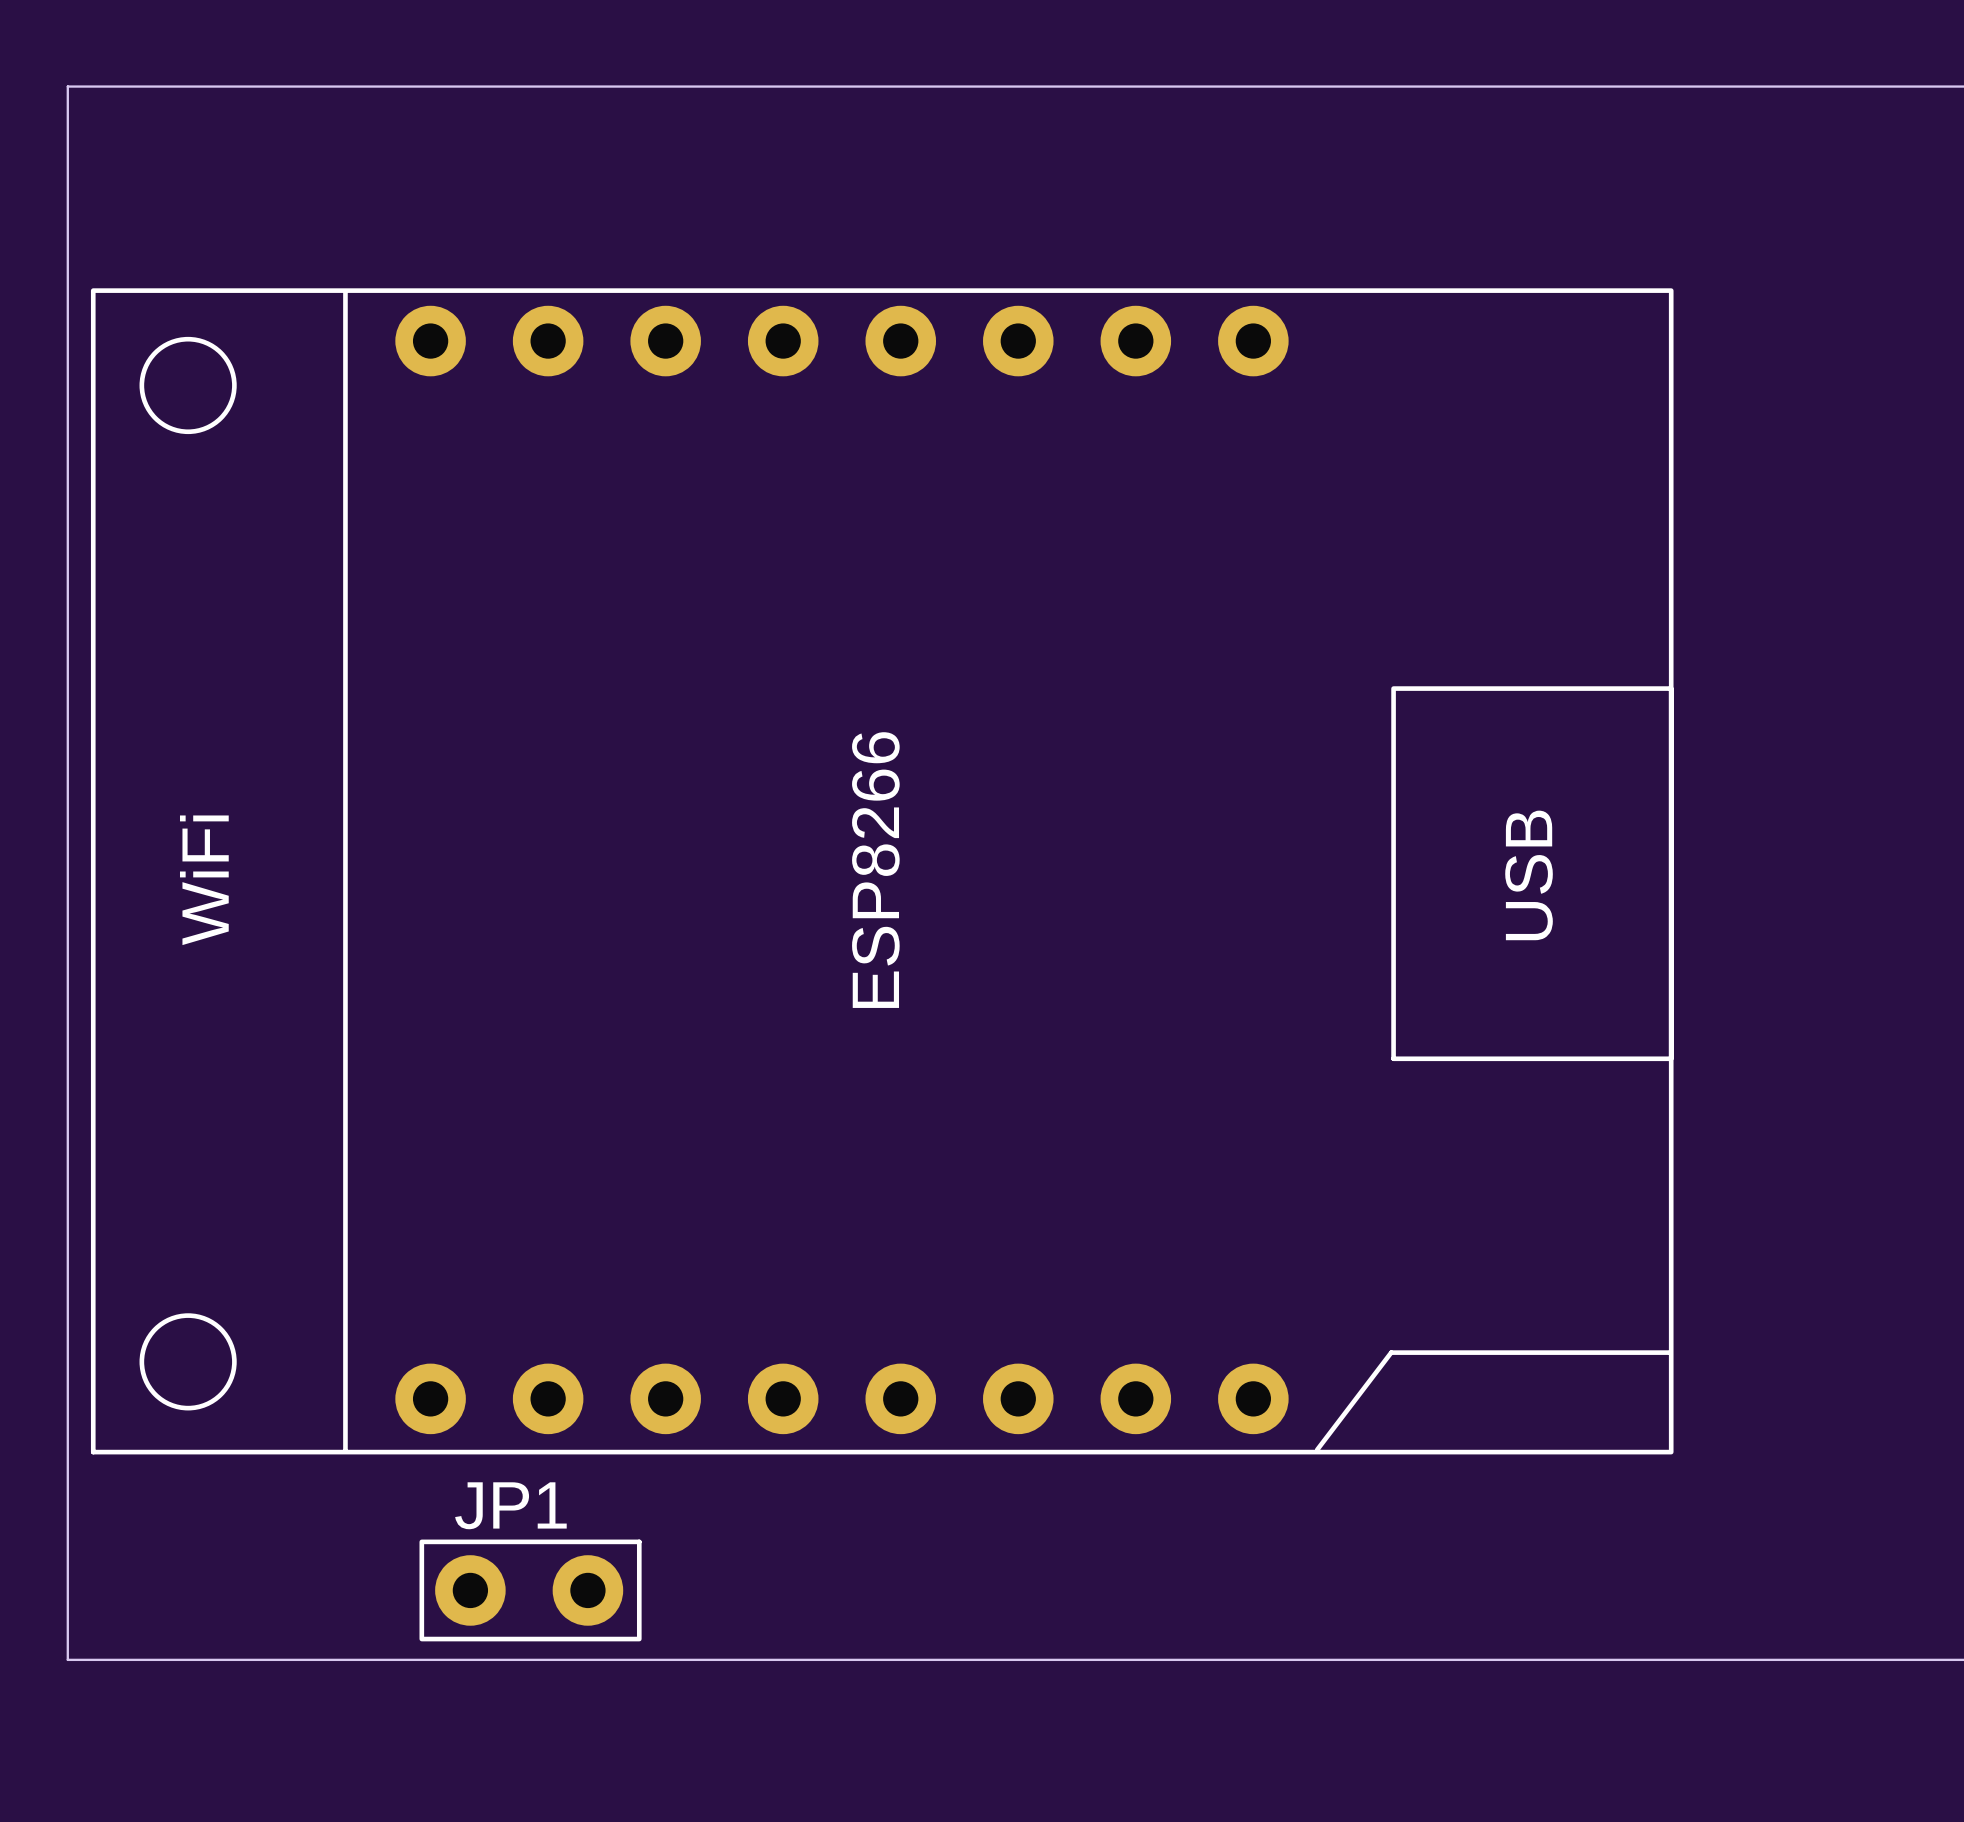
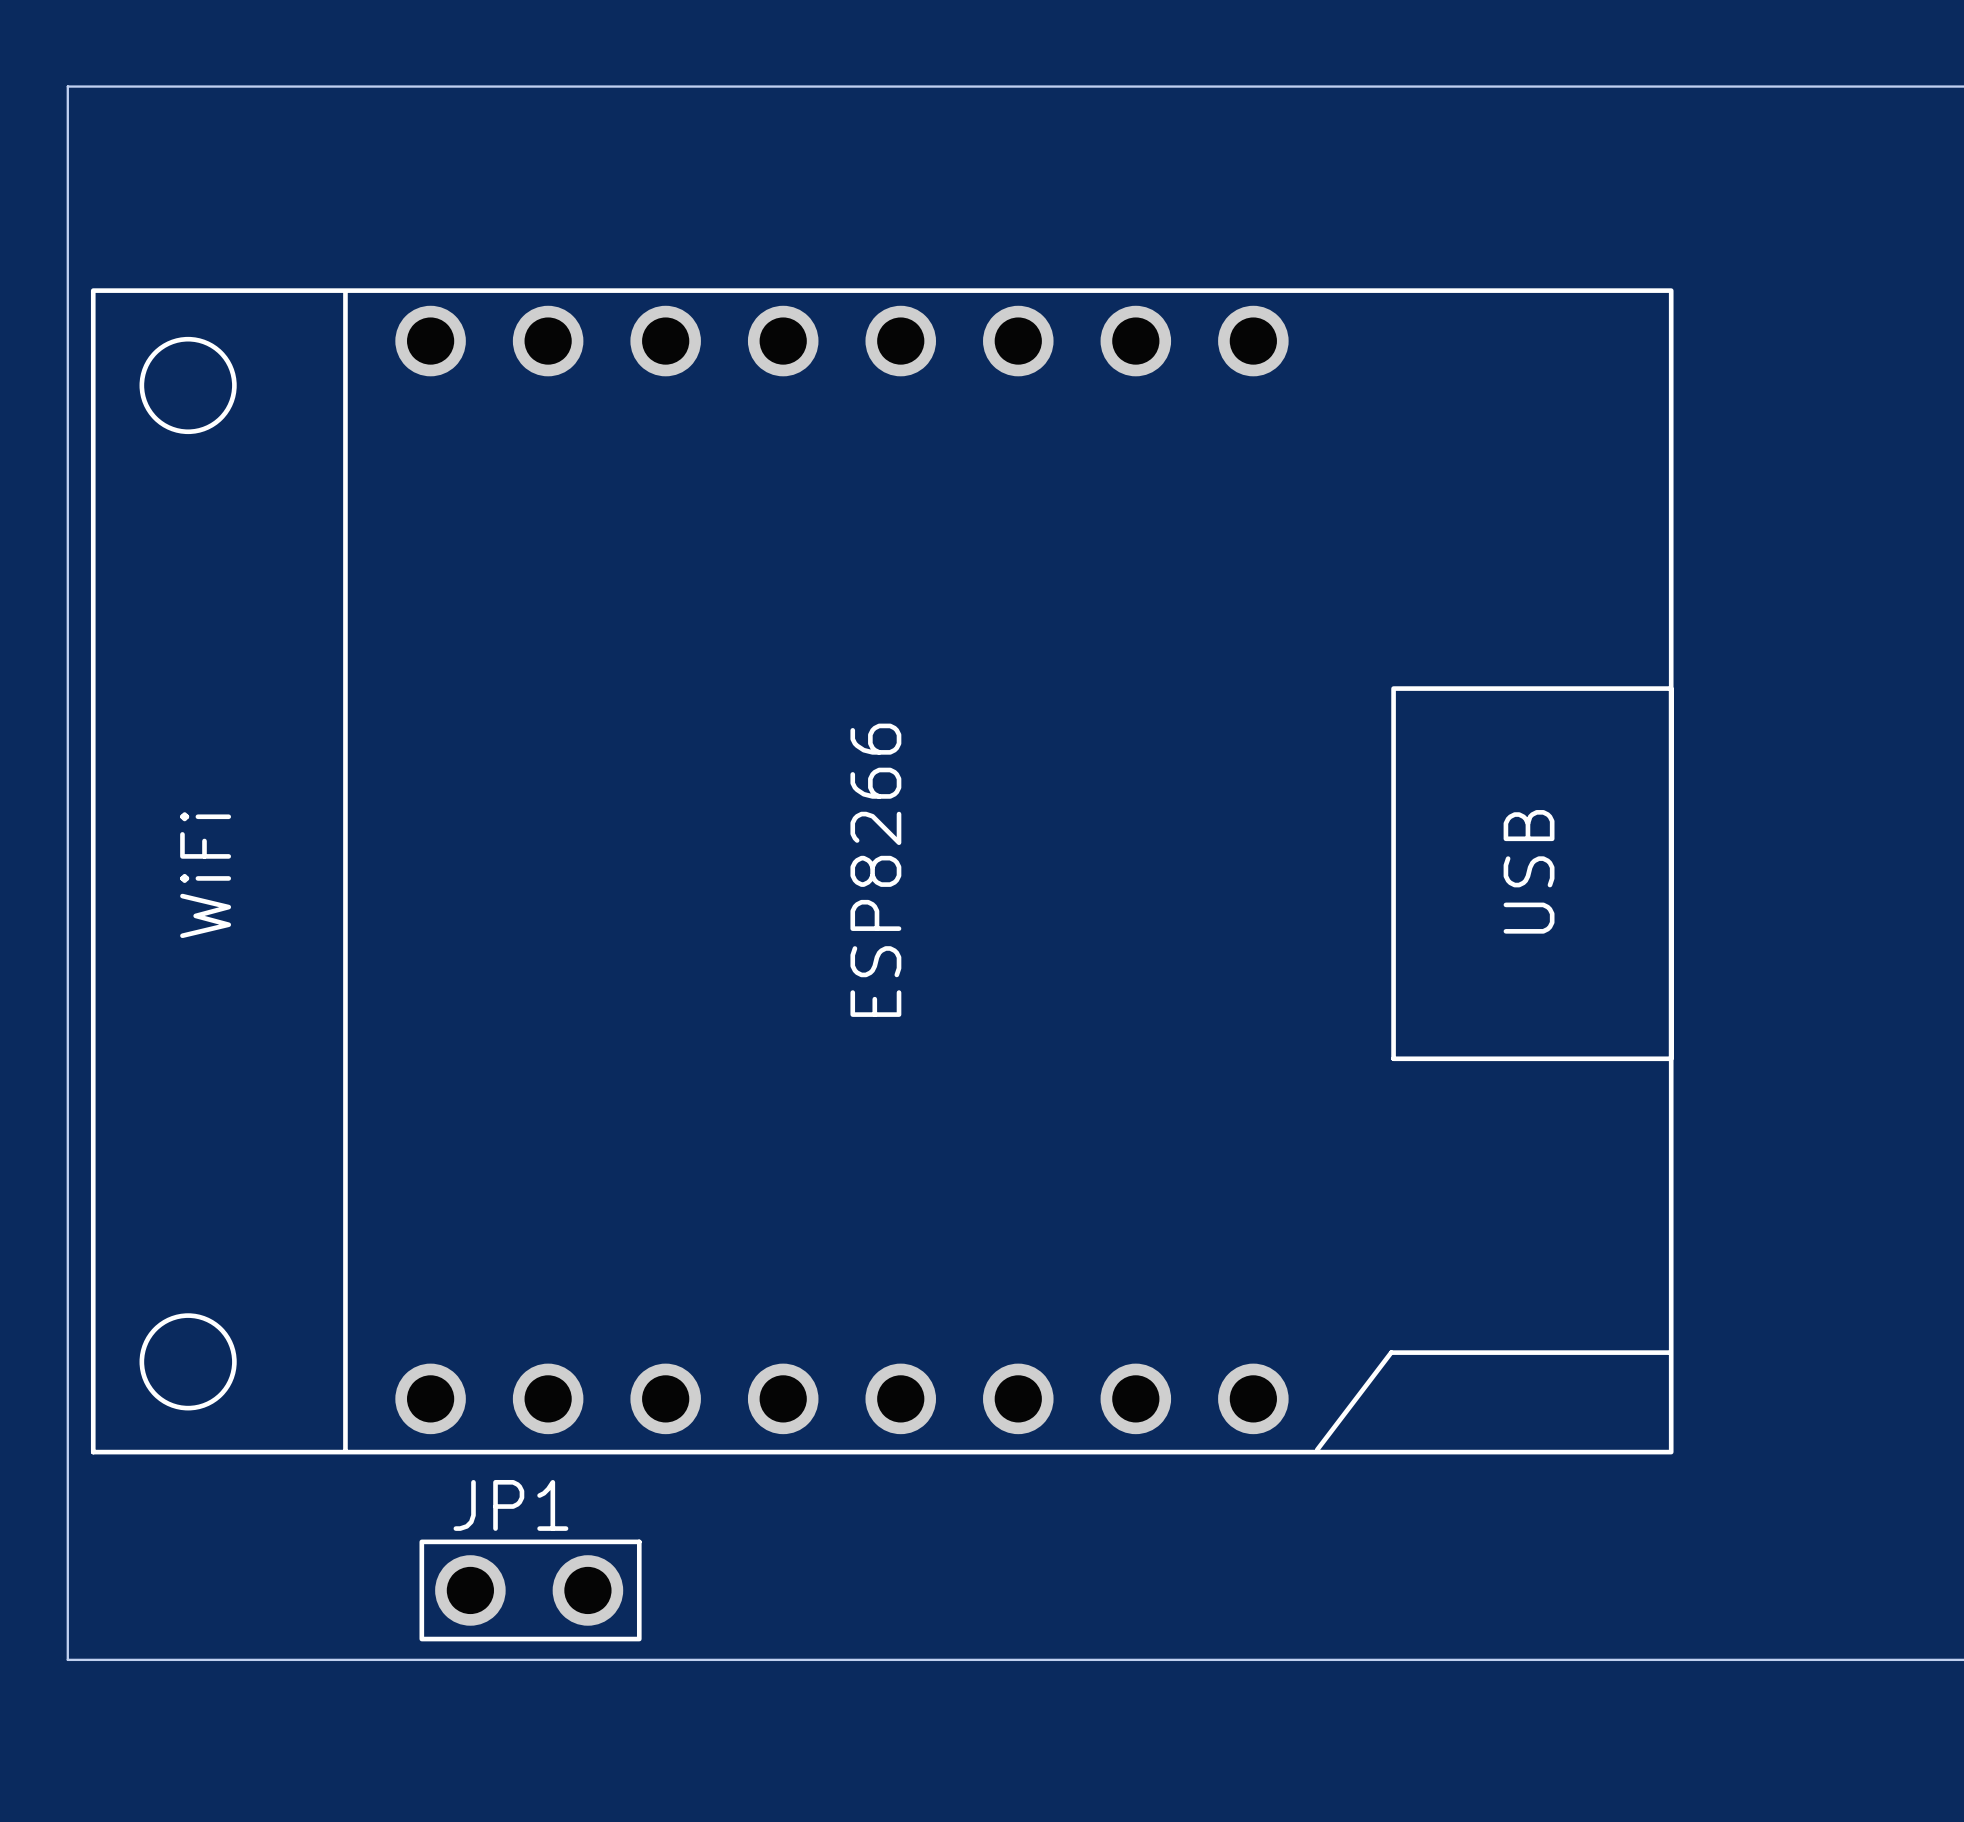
ESP8266 footprint: [90, 288, 1674, 1455] -> [90, 288, 1674, 1455]
JP1 footprint: [419, 1539, 642, 1642] -> [419, 1539, 642, 1642]

